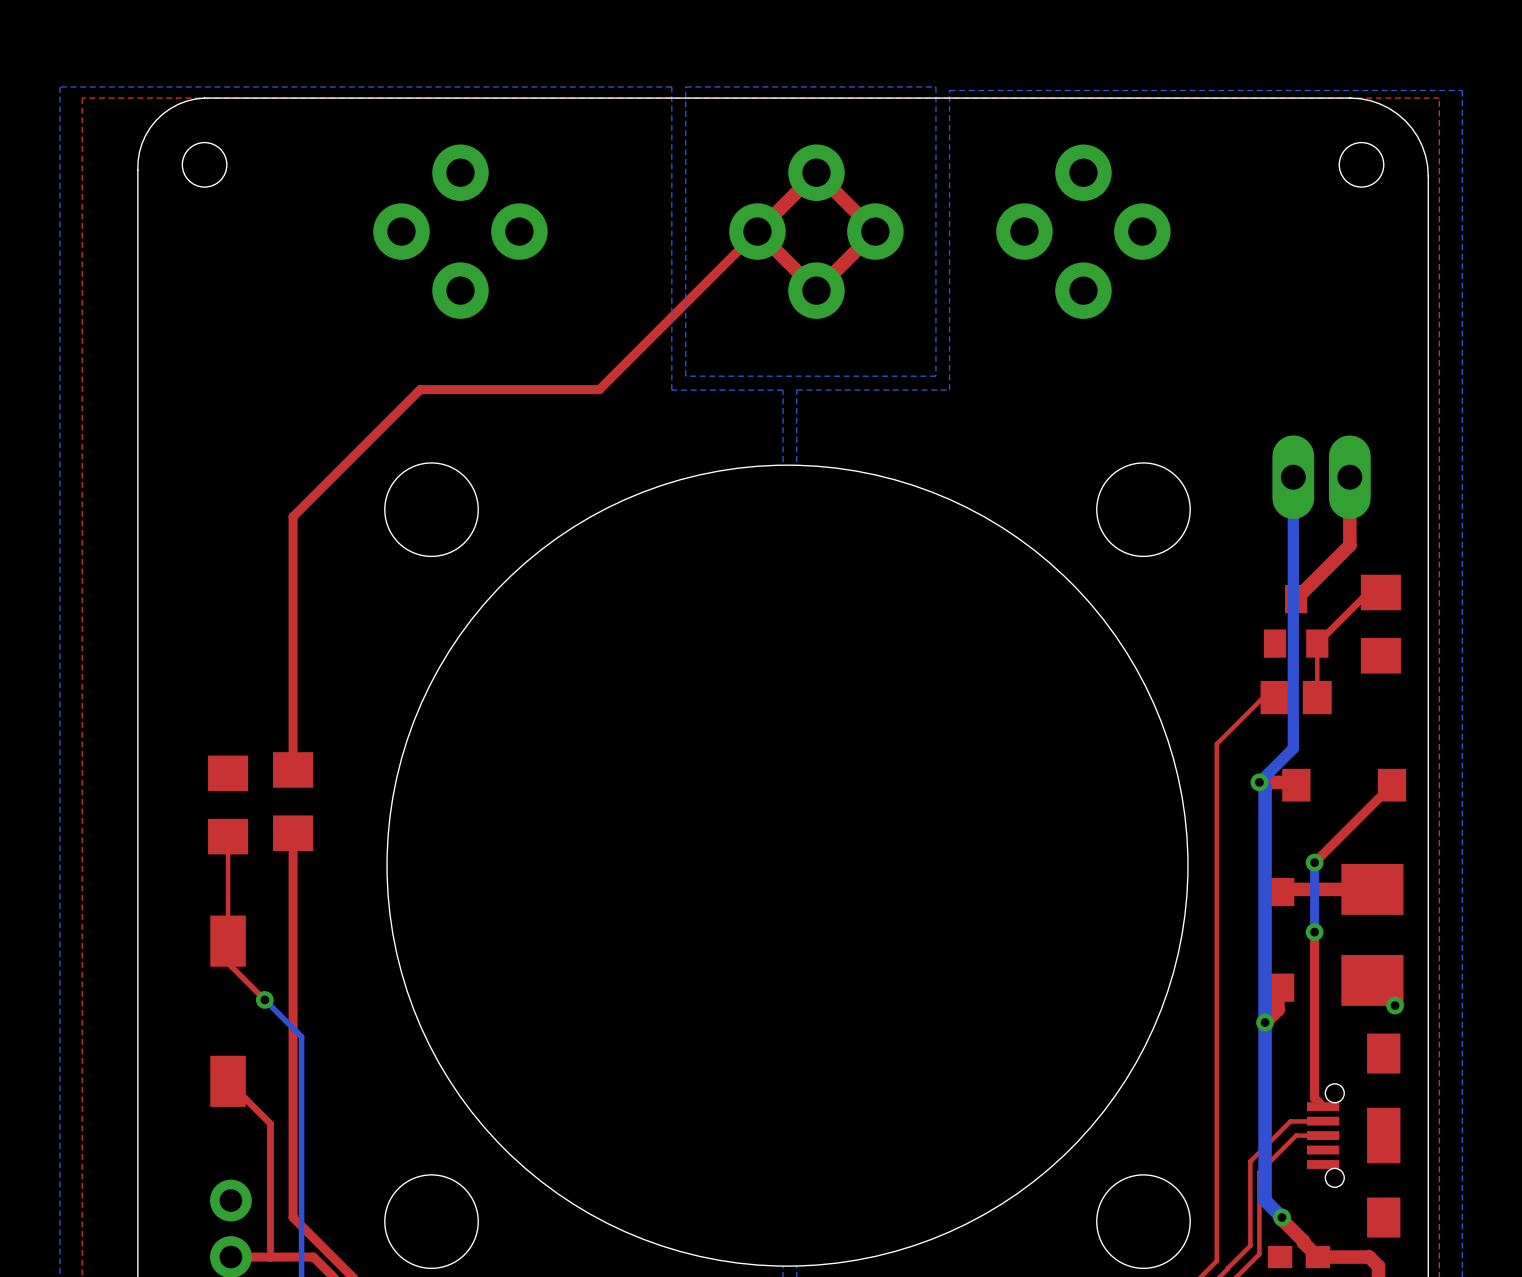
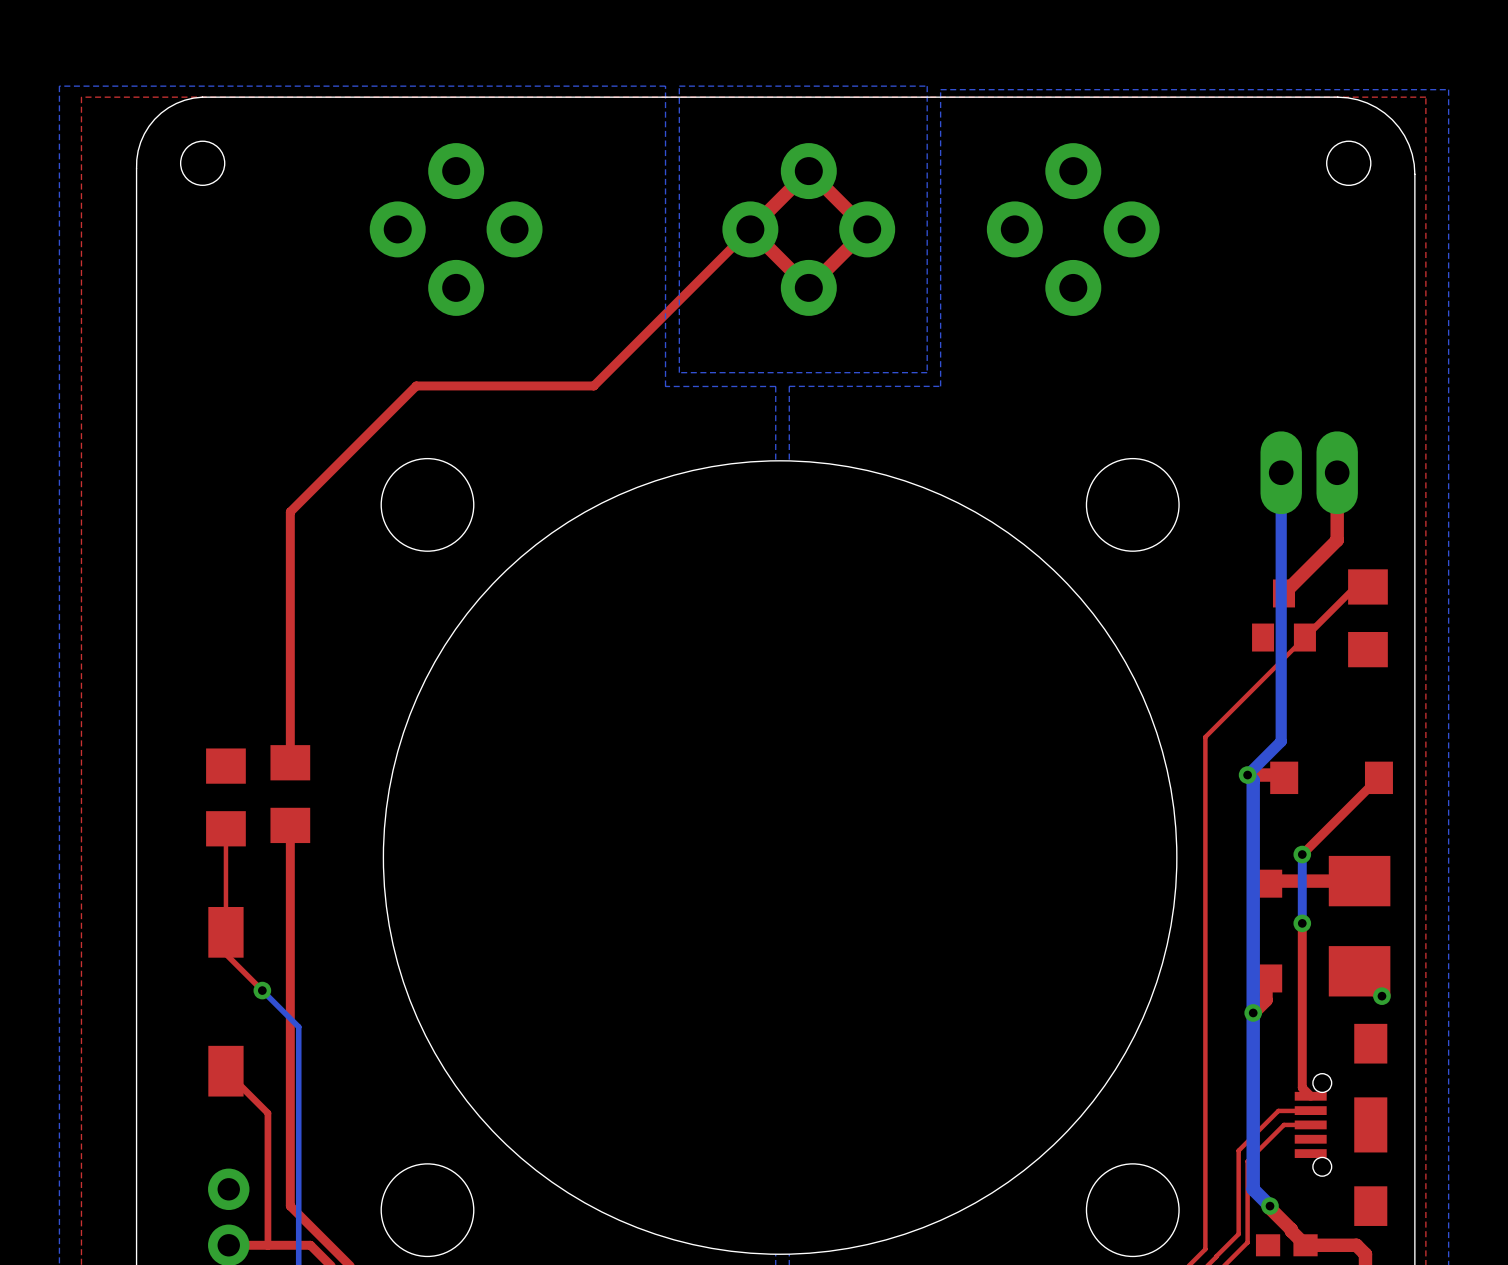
top track: (1317, 643) (1317, 697) -> (1304, 637) (1251, 691)
part: (1296, 697) -> none

